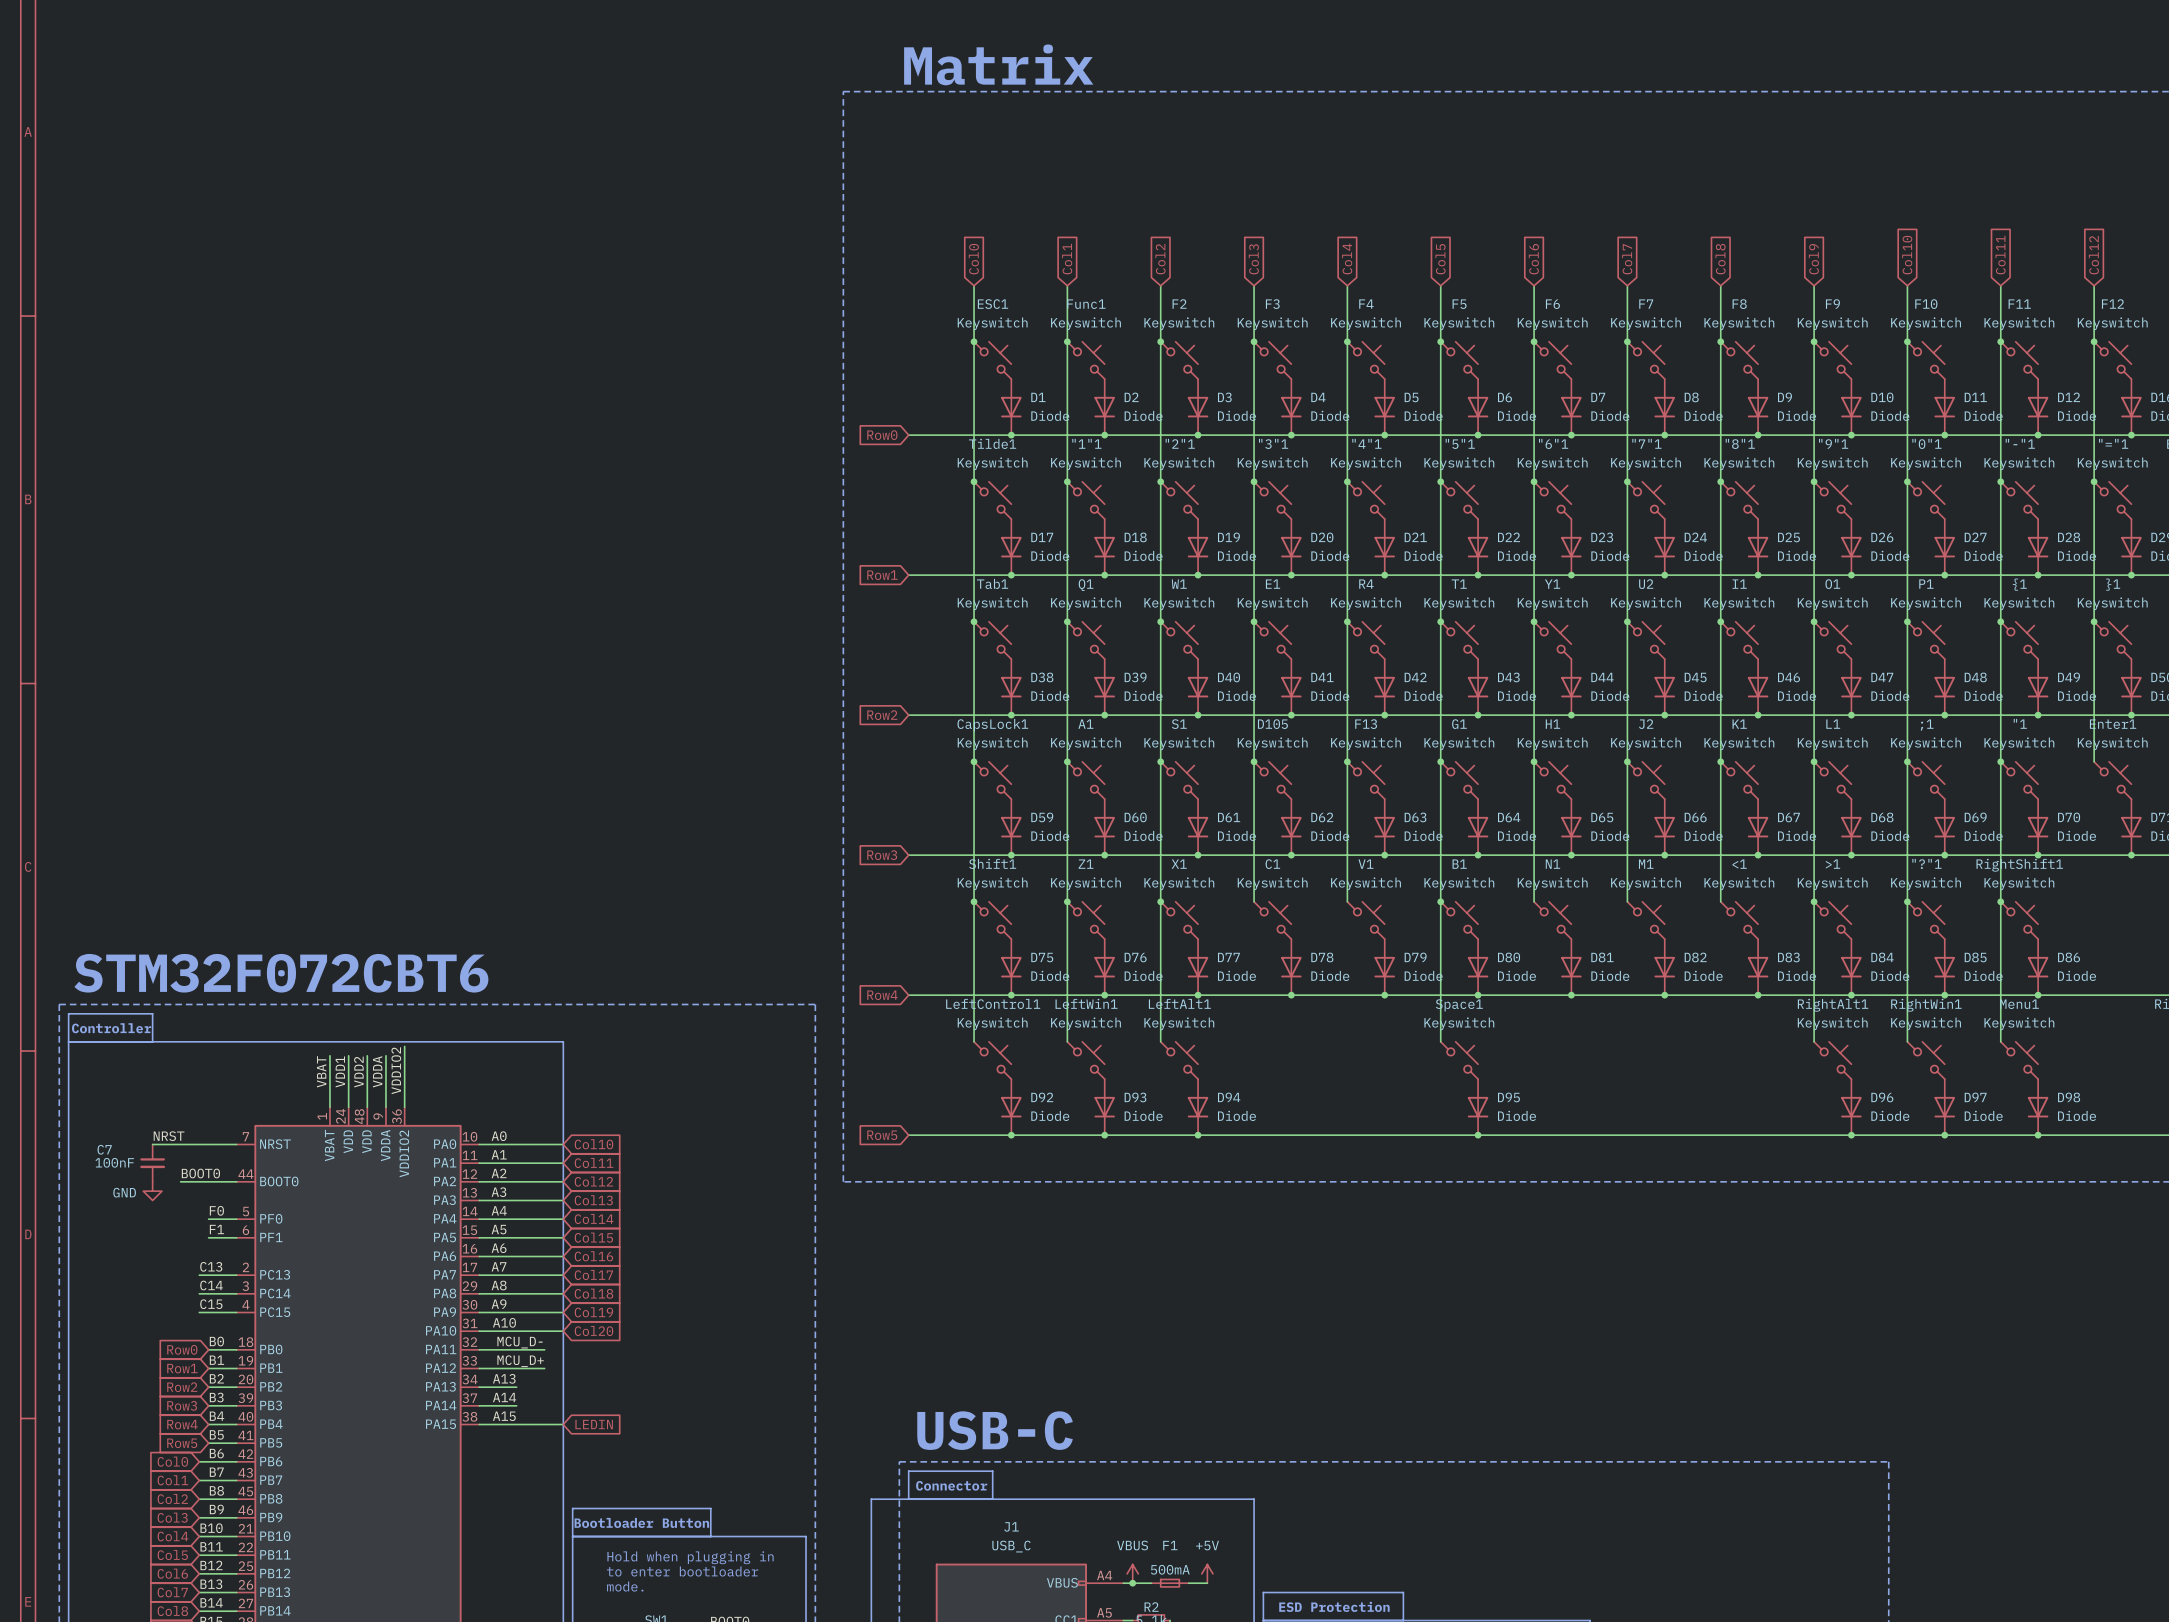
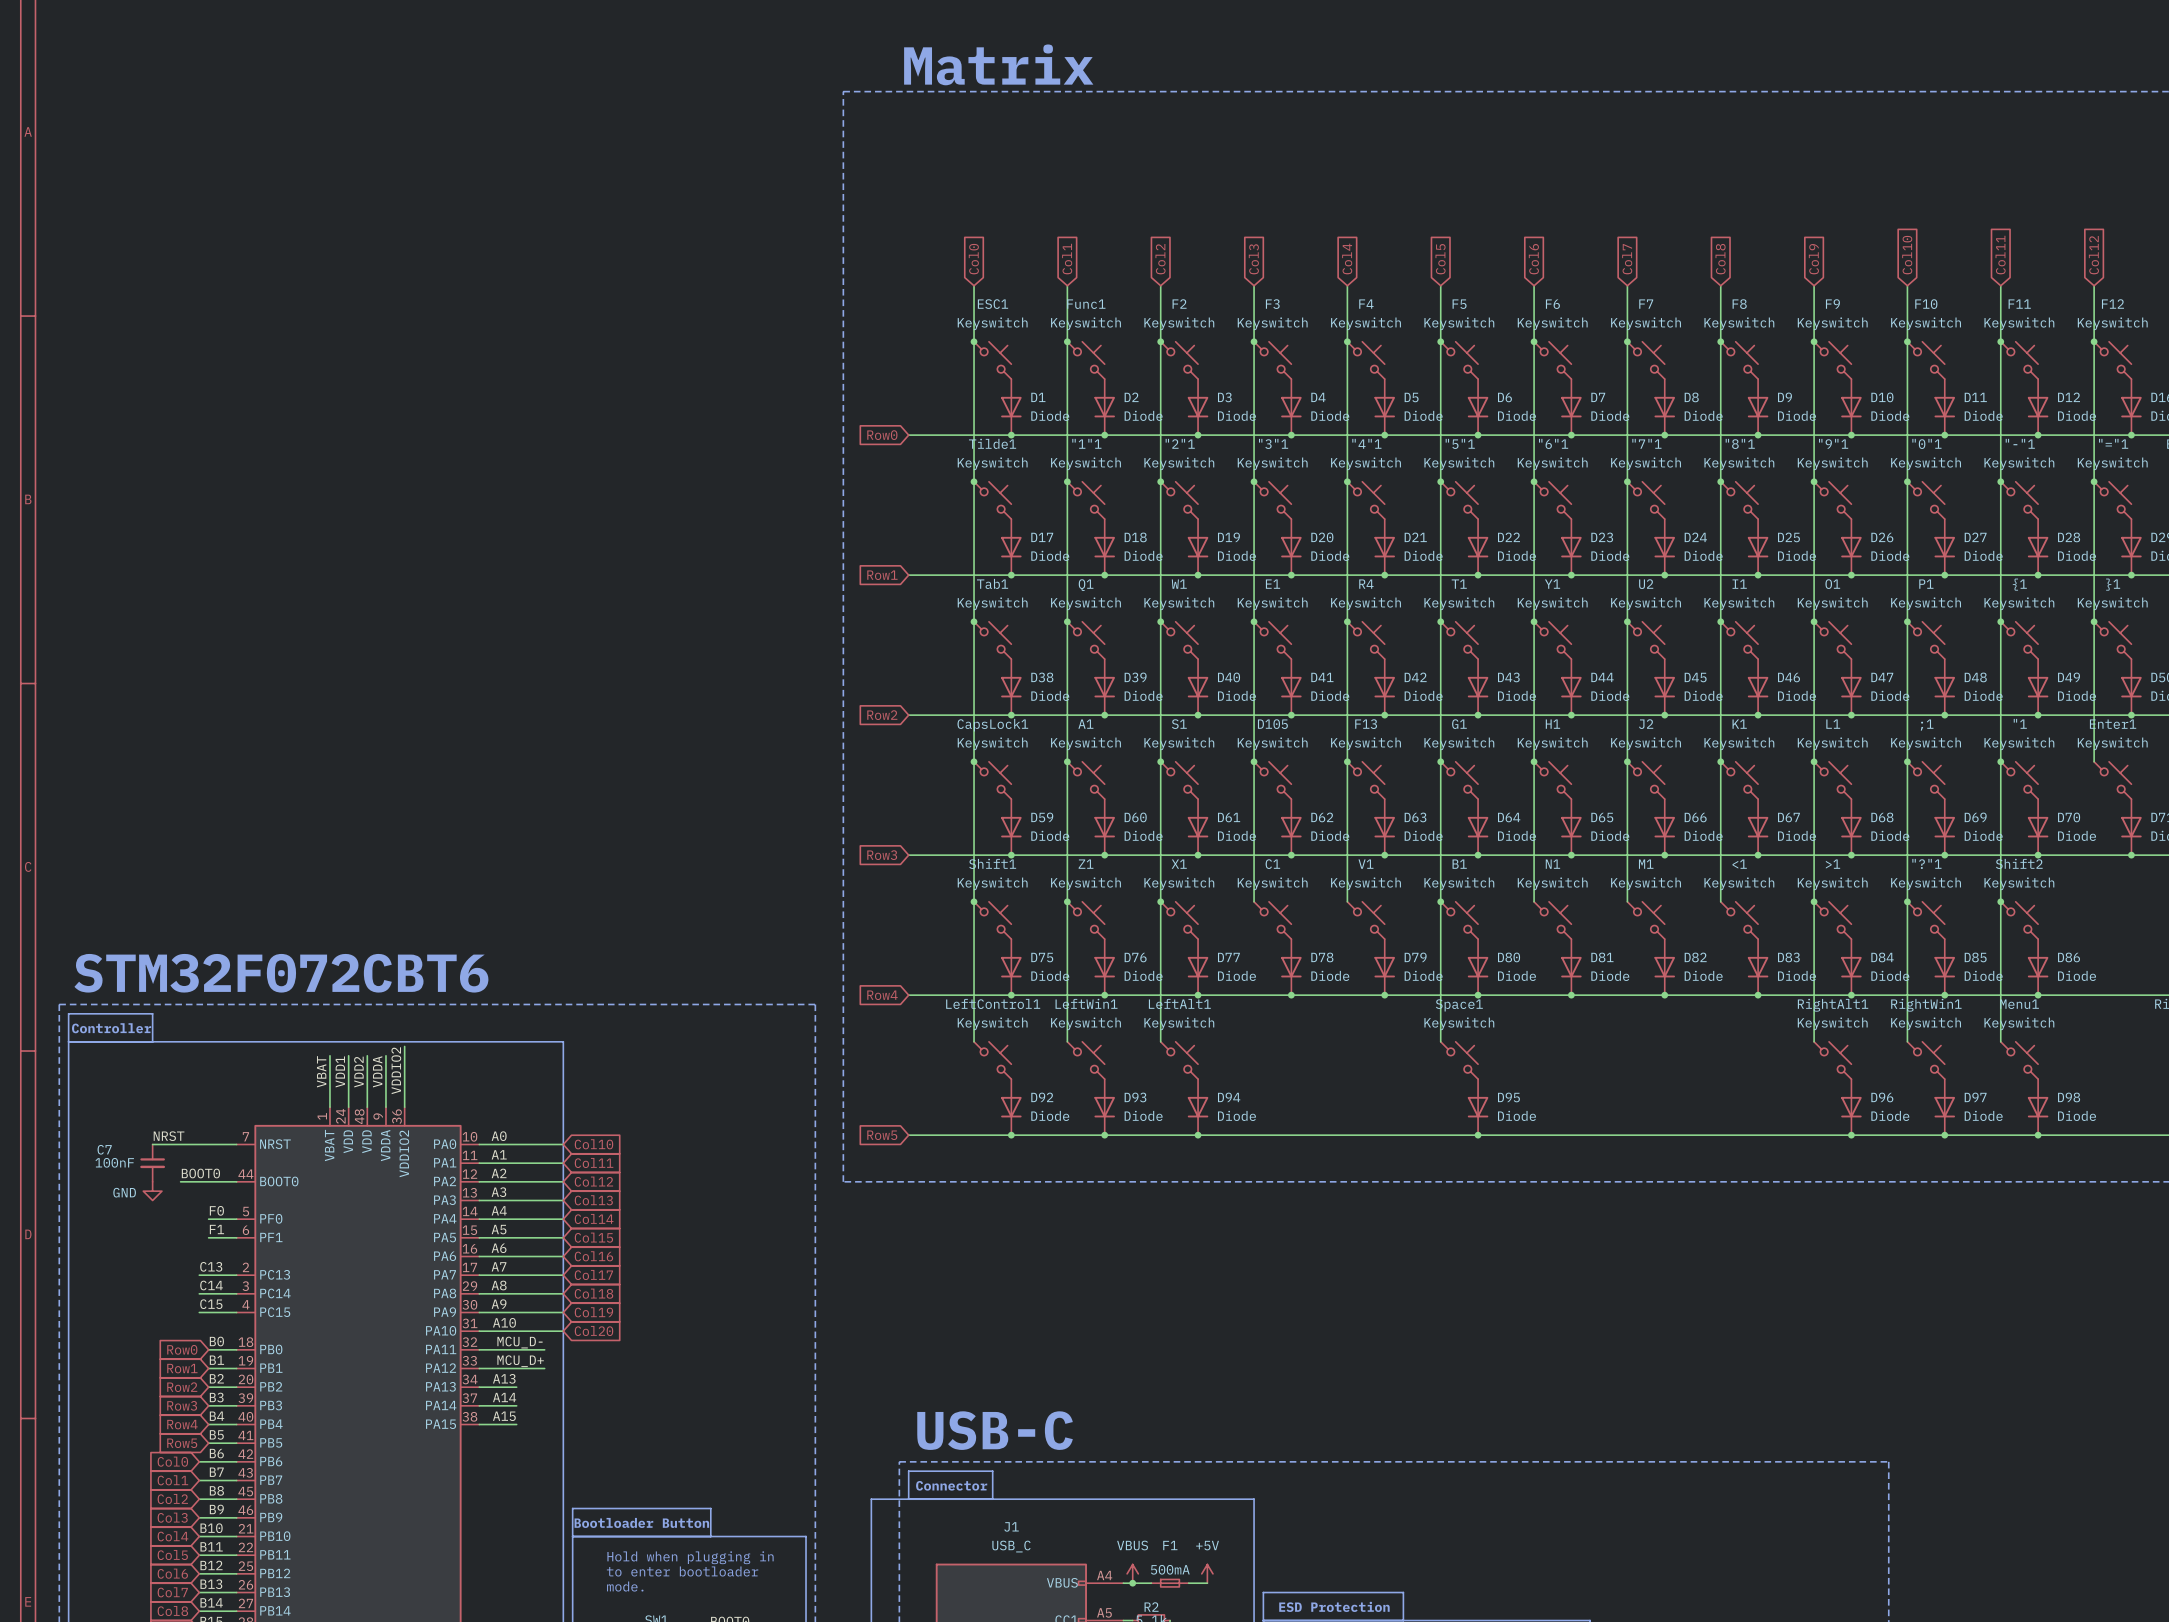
RightShift1 name: RightShift1 (2019, 865) -> Shift2 (2019, 863)
wire: (516, 1424) (563, 1424) -> none
global label: LEDIN (594, 1424) -> none

